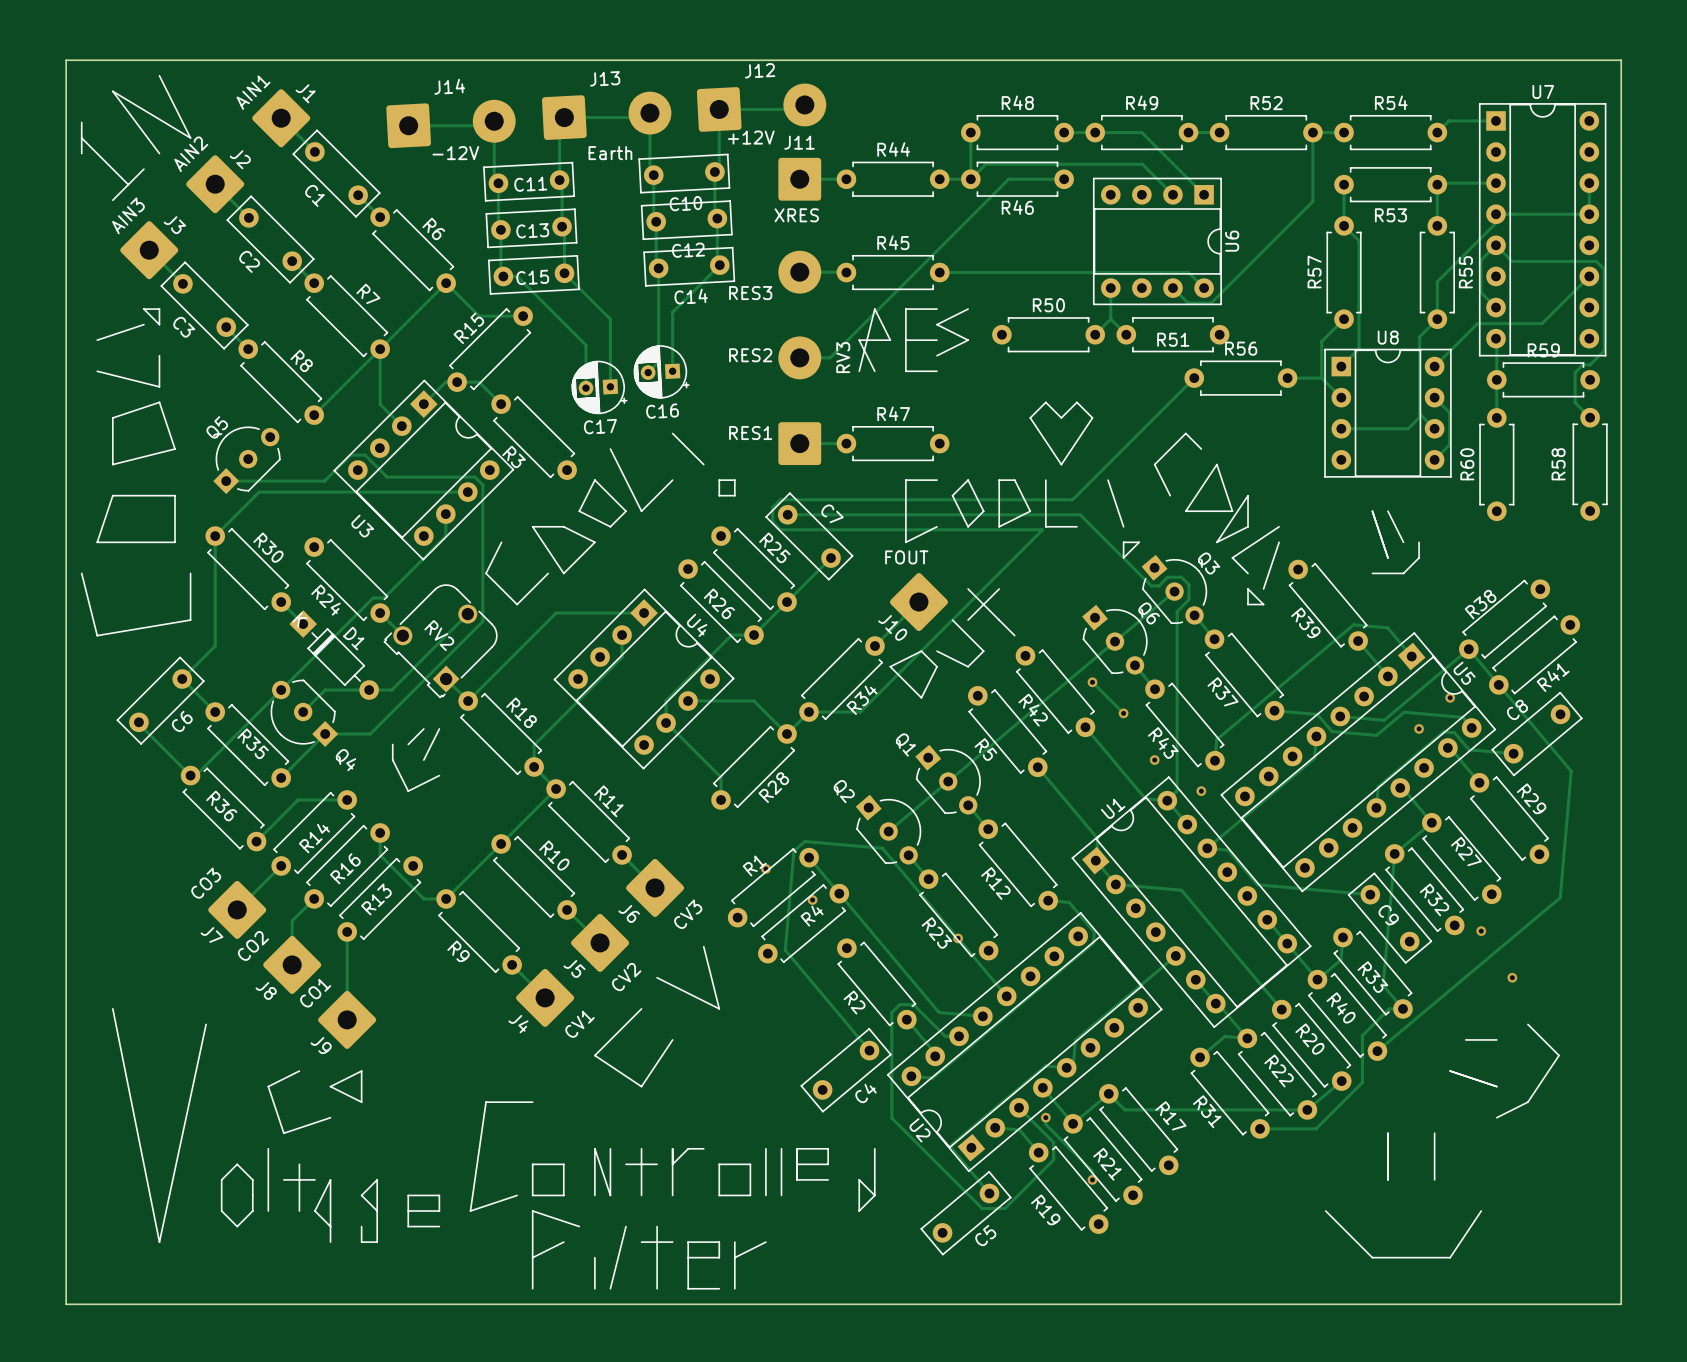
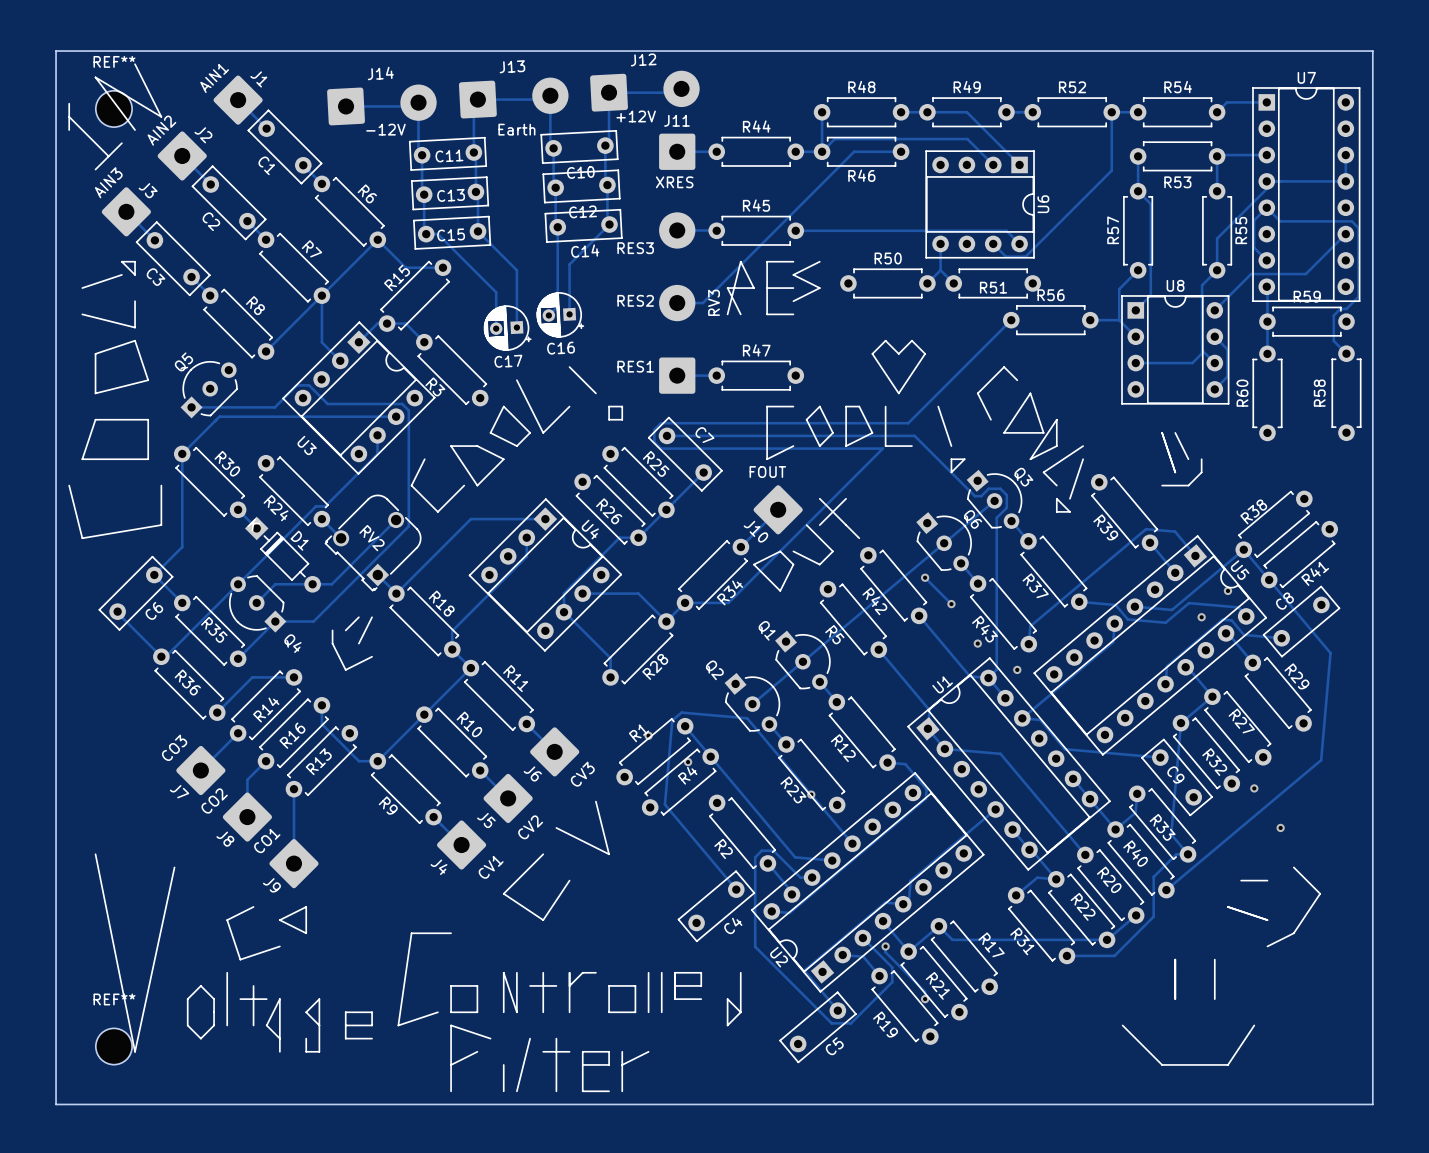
REF**: none -> (113, 108)
REF**: none -> (113, 1046)

